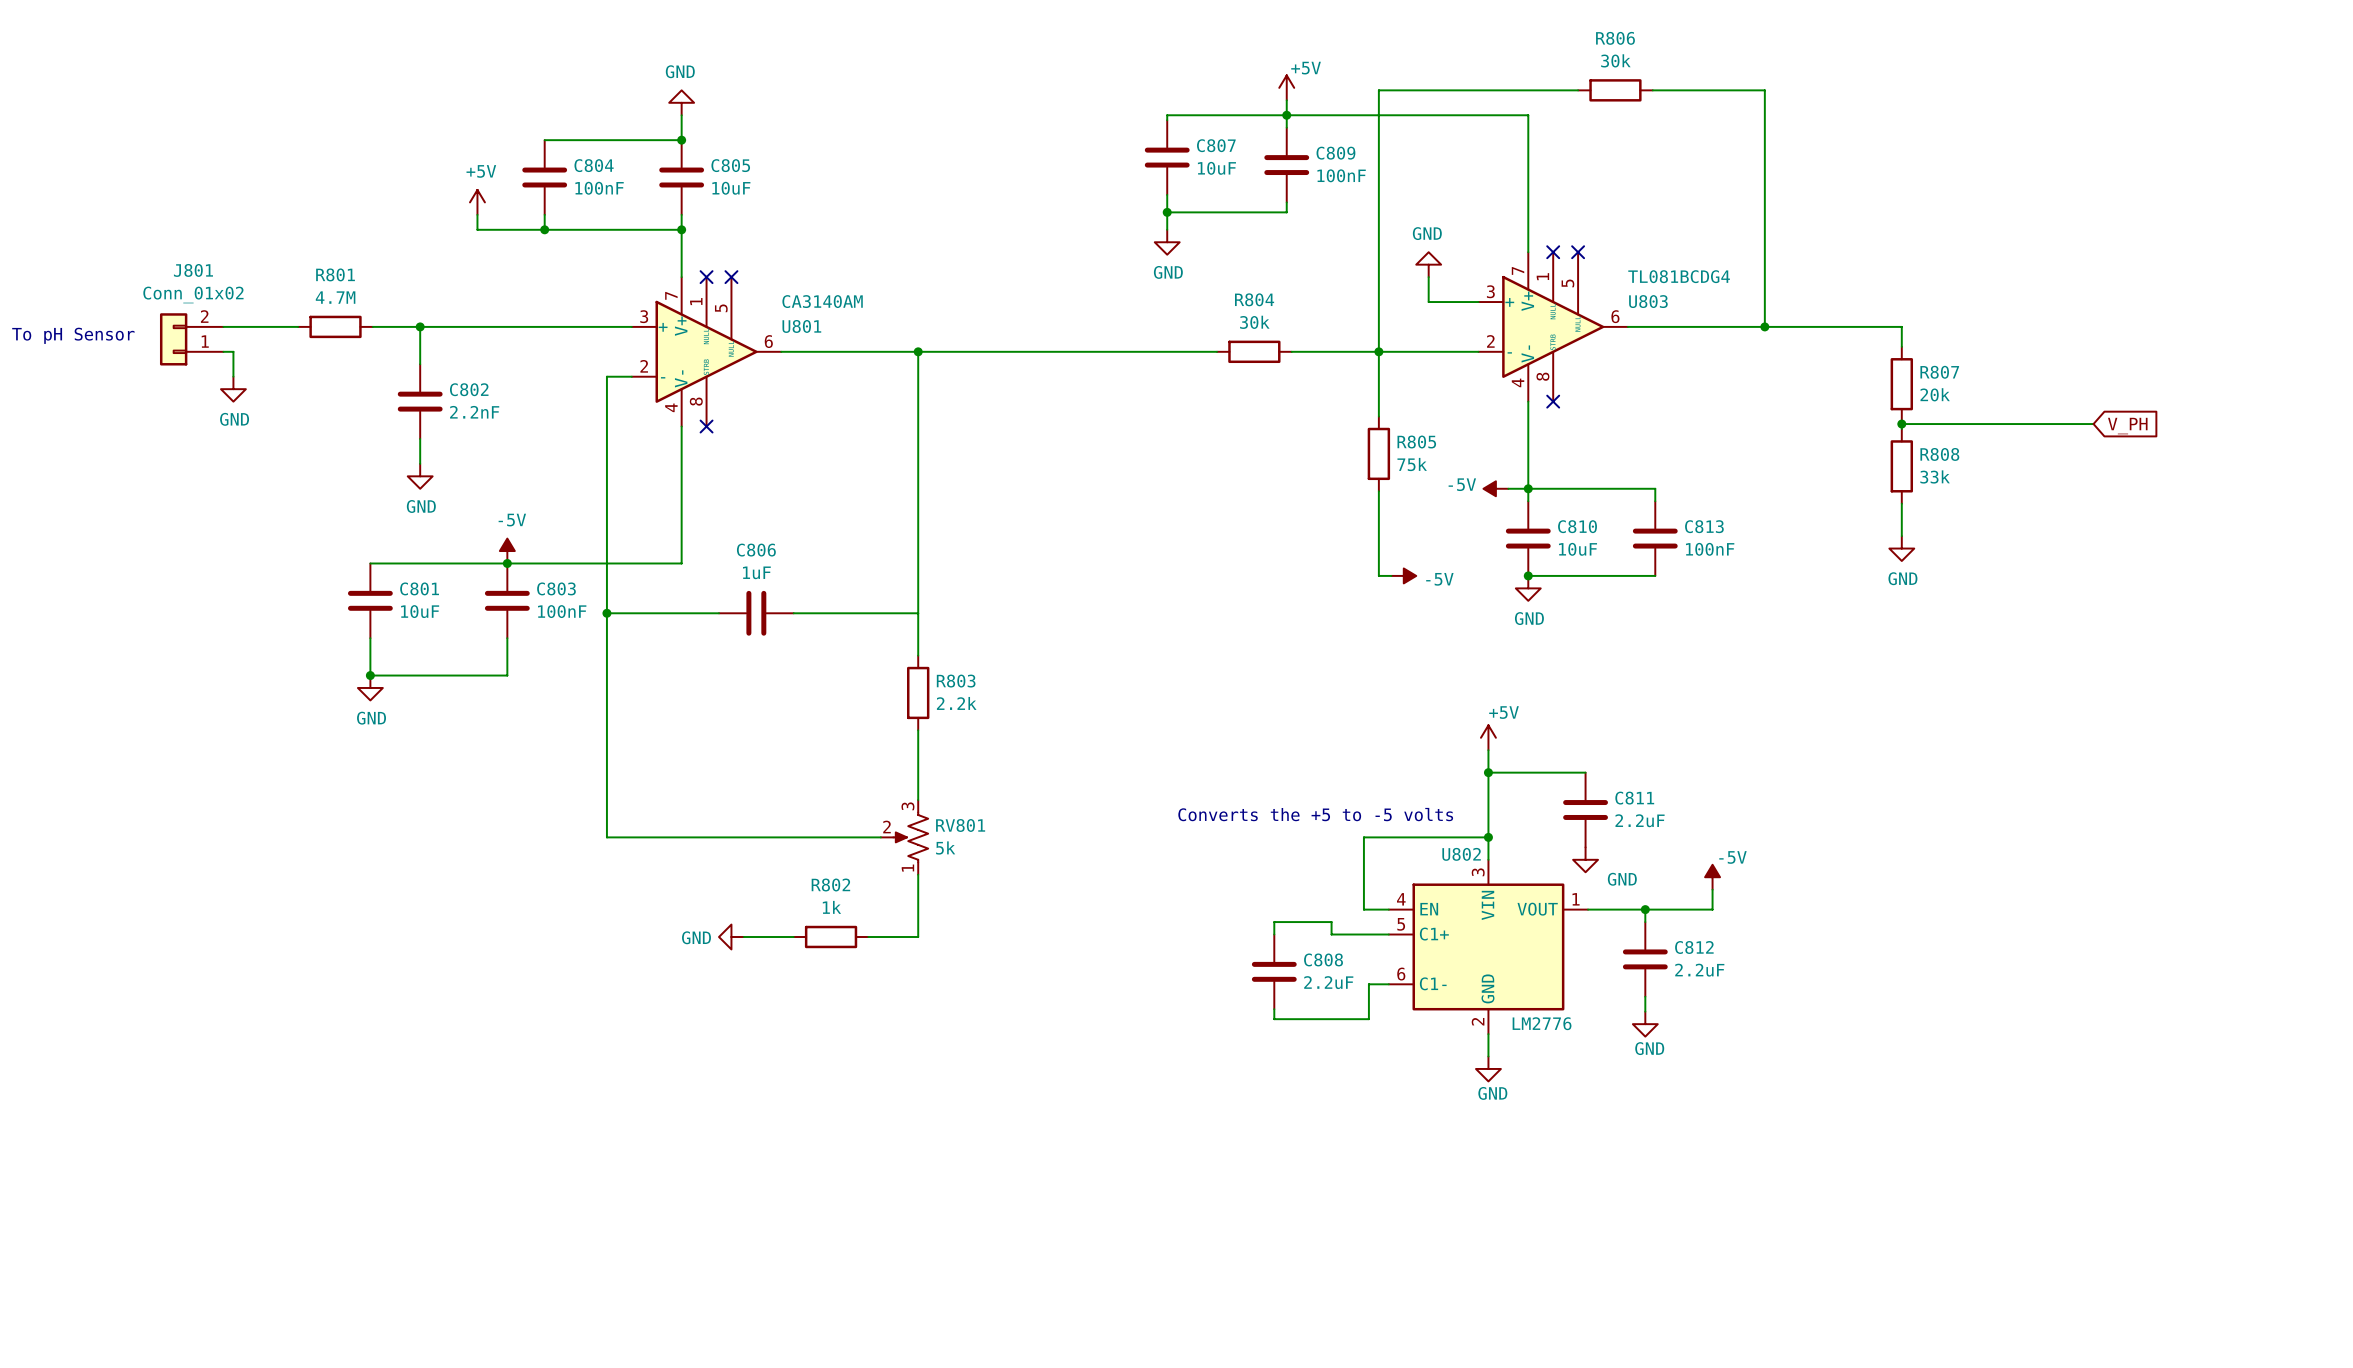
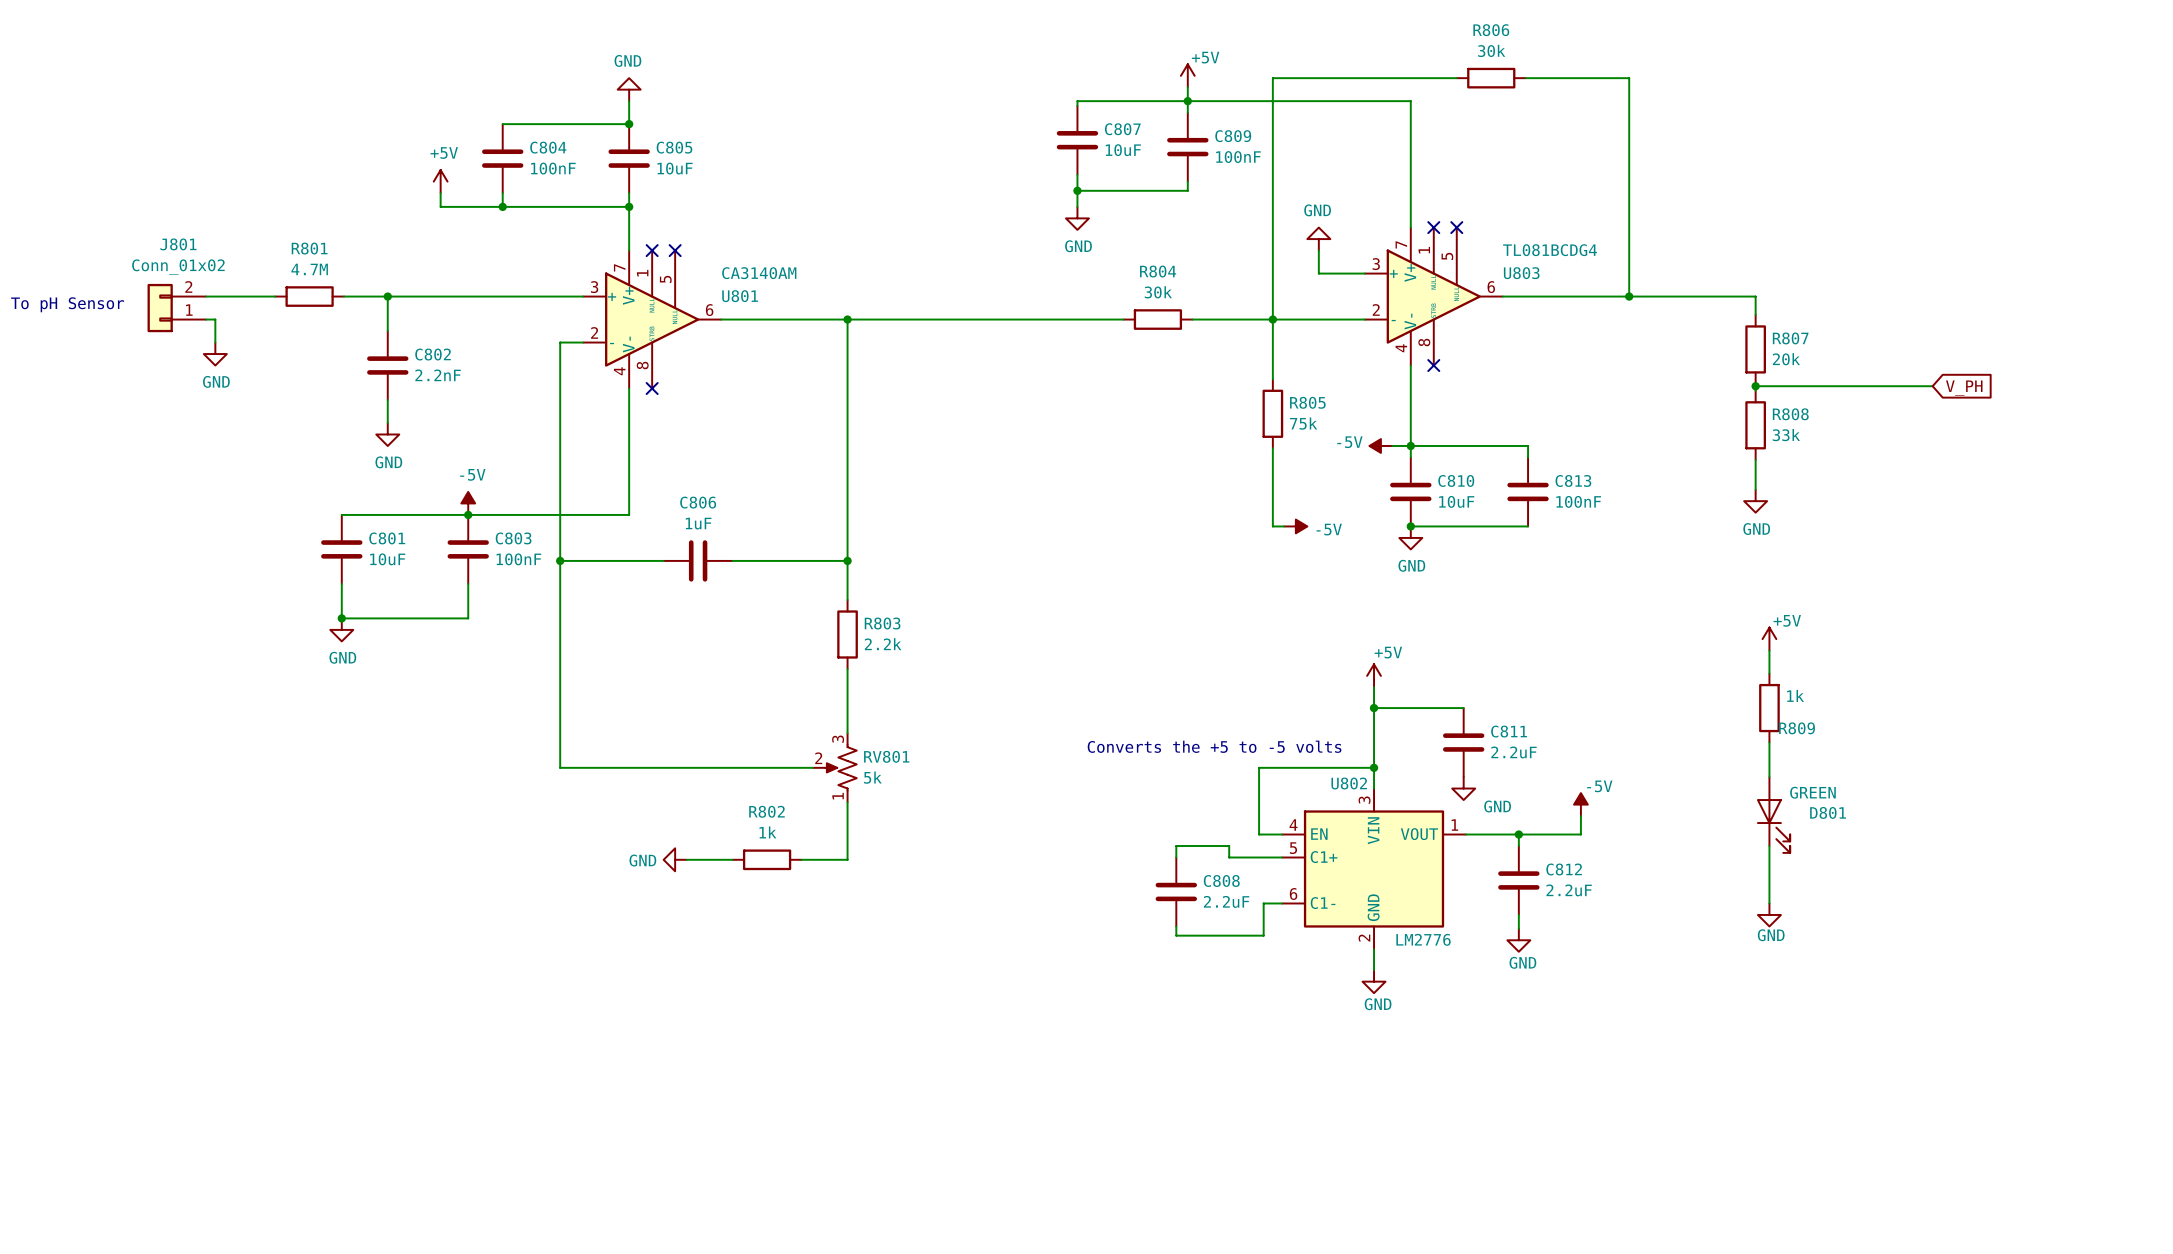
junction: none -> (847, 560)
power symbol: none -> +5V (1769, 639)
wire: none -> (1769, 650) (1769, 673)
R809: none -> 1k (1769, 708)
wire: none -> (1769, 742) (1769, 777)
D801: none -> GREEN (1773, 814)
wire: none -> (1769, 846) (1769, 903)
power symbol: none -> GND (1769, 914)

